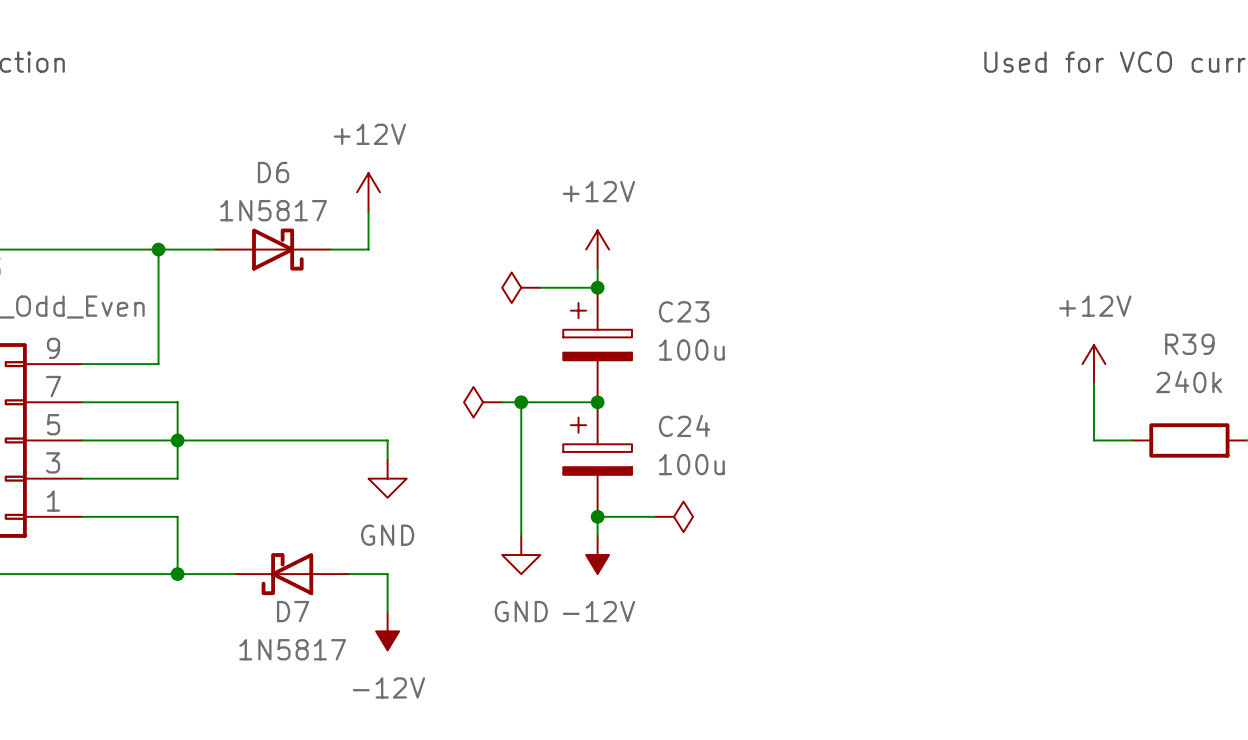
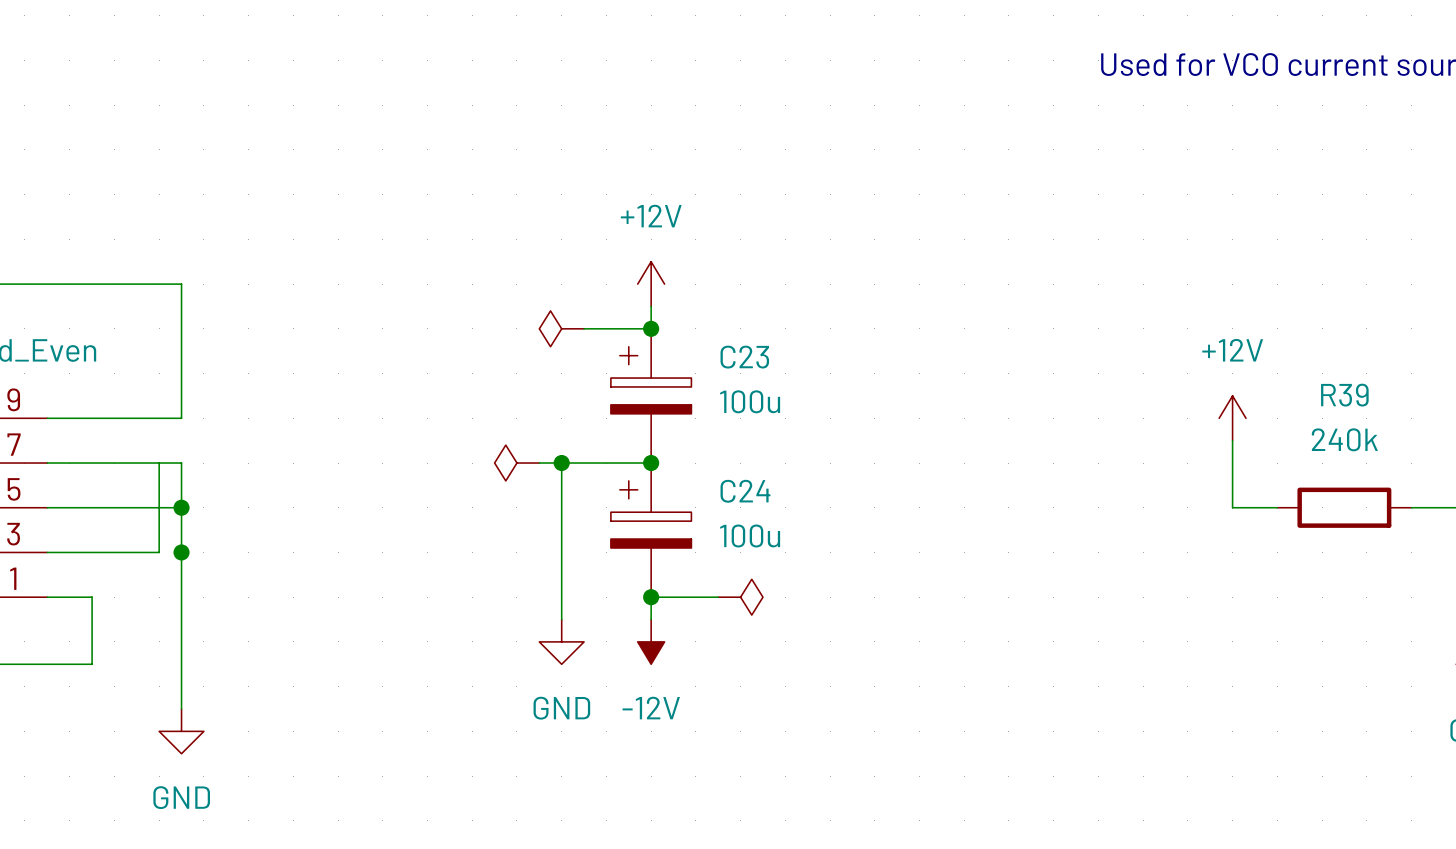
power symbol: +12V (368, 192) -> none
wire: (368, 211) (368, 249) (330, 249) -> none
wire: (158, 249) (158, 364) -> (181, 284) (181, 418) (136, 418)
junction: (158, 249) -> none
wire: (196, 249) (215, 249) -> none
D6: 1N5817 (273, 249) -> none
wire: none -> (159, 463) (181, 463) (181, 709)
junction position: (177, 440) -> (181, 507)
wire: (196, 440) (387, 440) (387, 459) -> none
junction: none -> (181, 552)
power symbol position: GND (387, 478) -> GND (181, 731)
wire: (120, 516) (177, 516) (177, 574) -> (92, 597) (92, 664)
wire: (120, 574) (234, 574) -> none
junction: (177, 574) -> none
D7: 1N5817 (292, 574) -> none
wire: (349, 574) (387, 574) (387, 612) -> none
power symbol: -12V (387, 631) -> none

